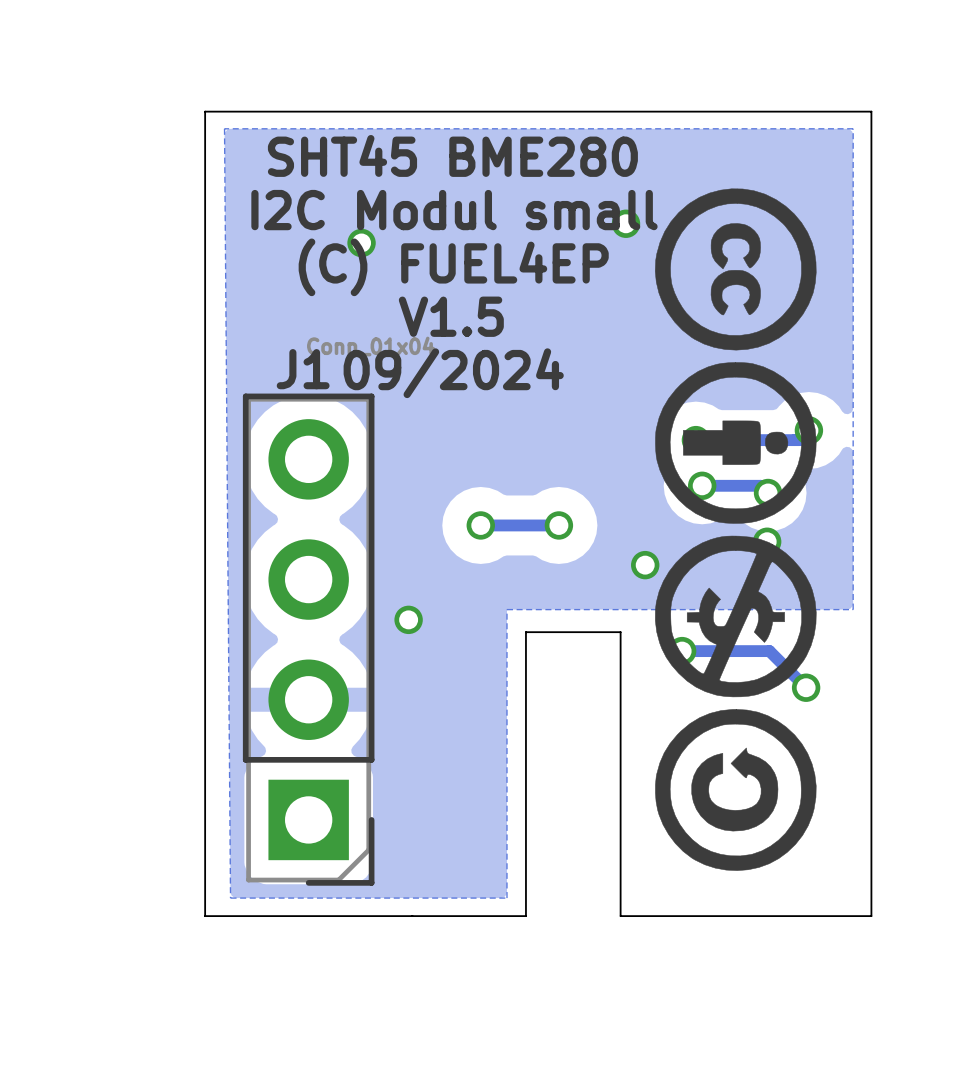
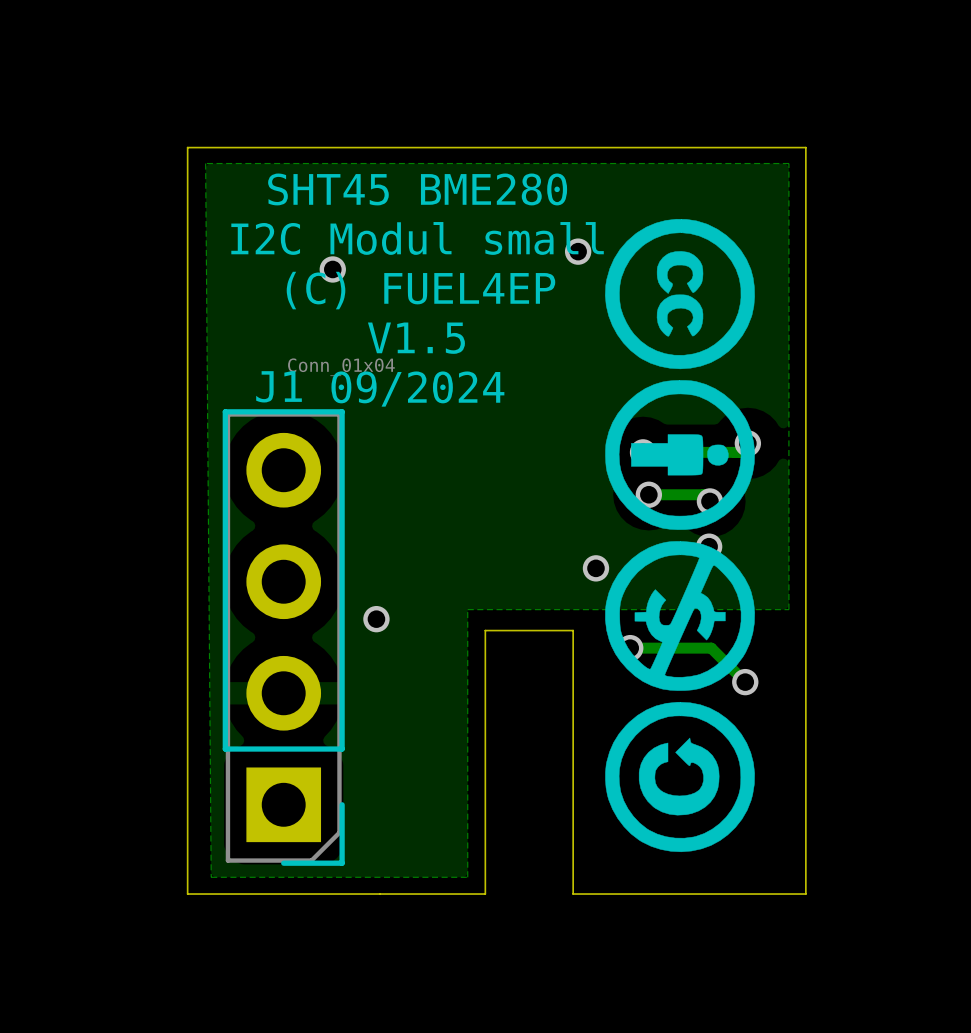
via: (480, 525) -> none
track: (558, 525) (480, 525) -> none
via: (558, 525) -> none

